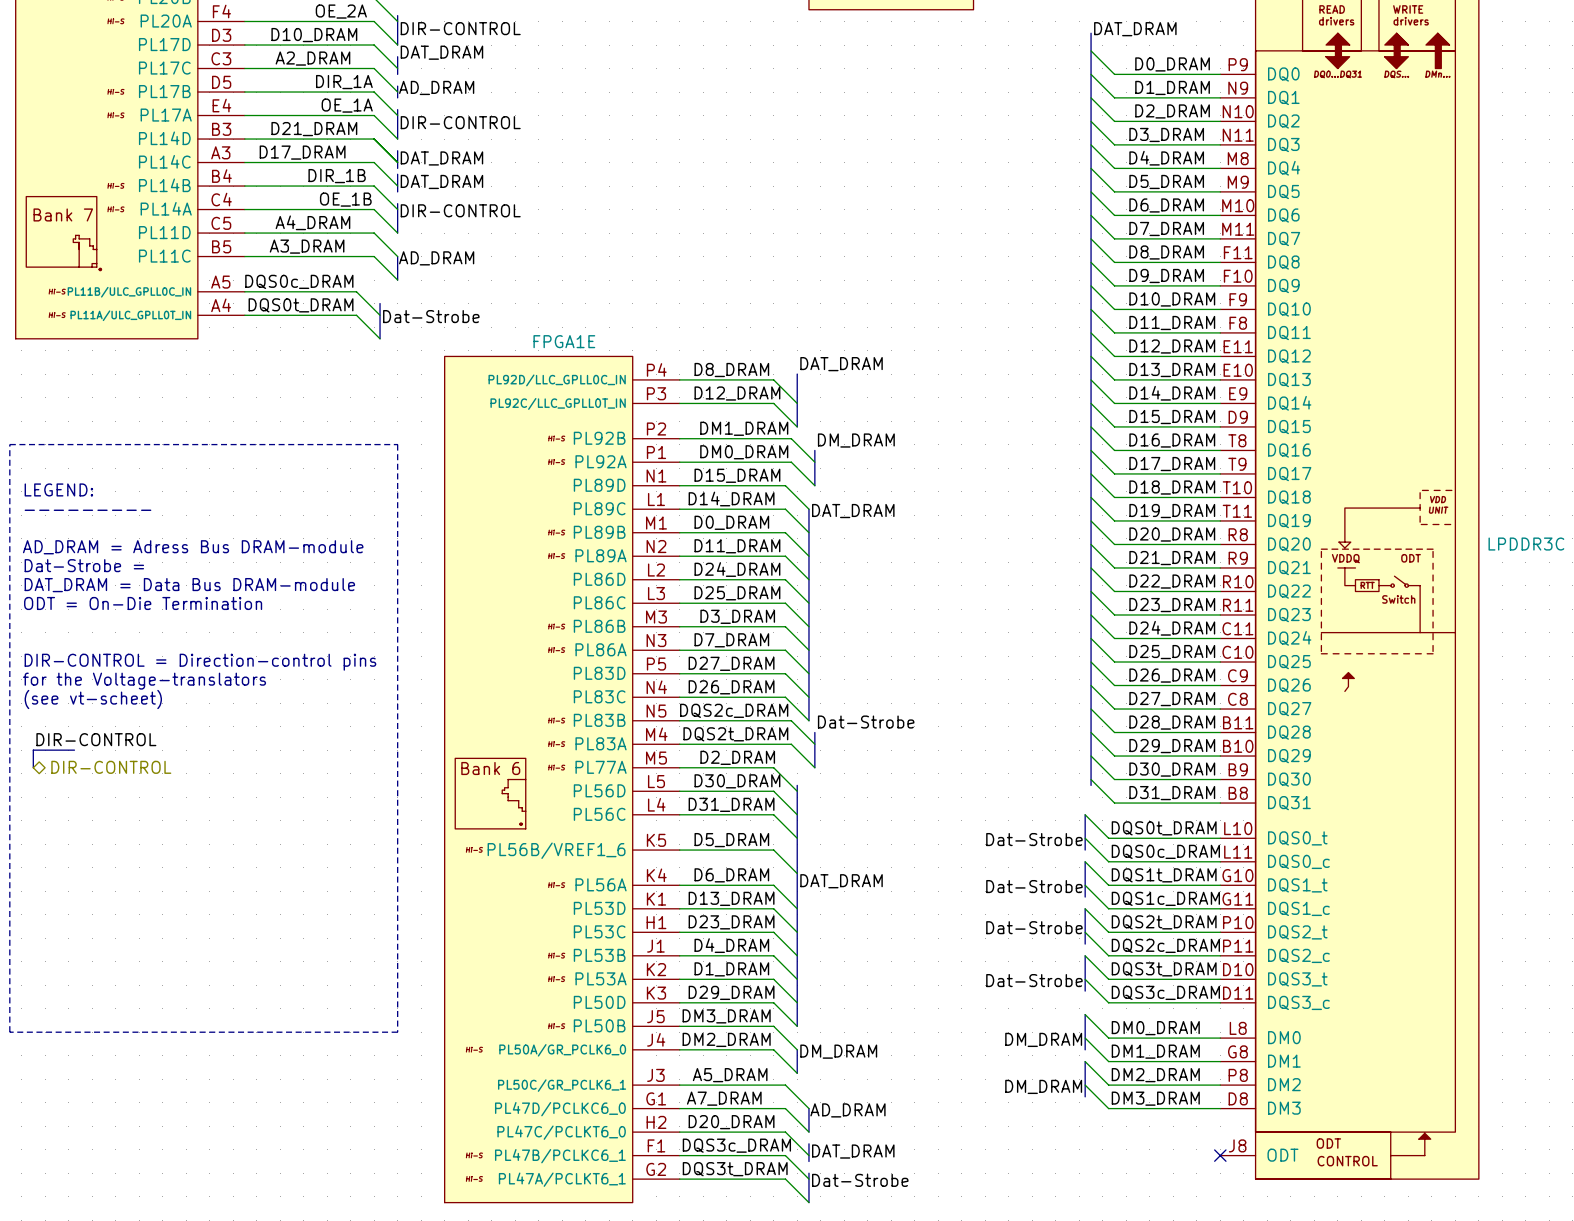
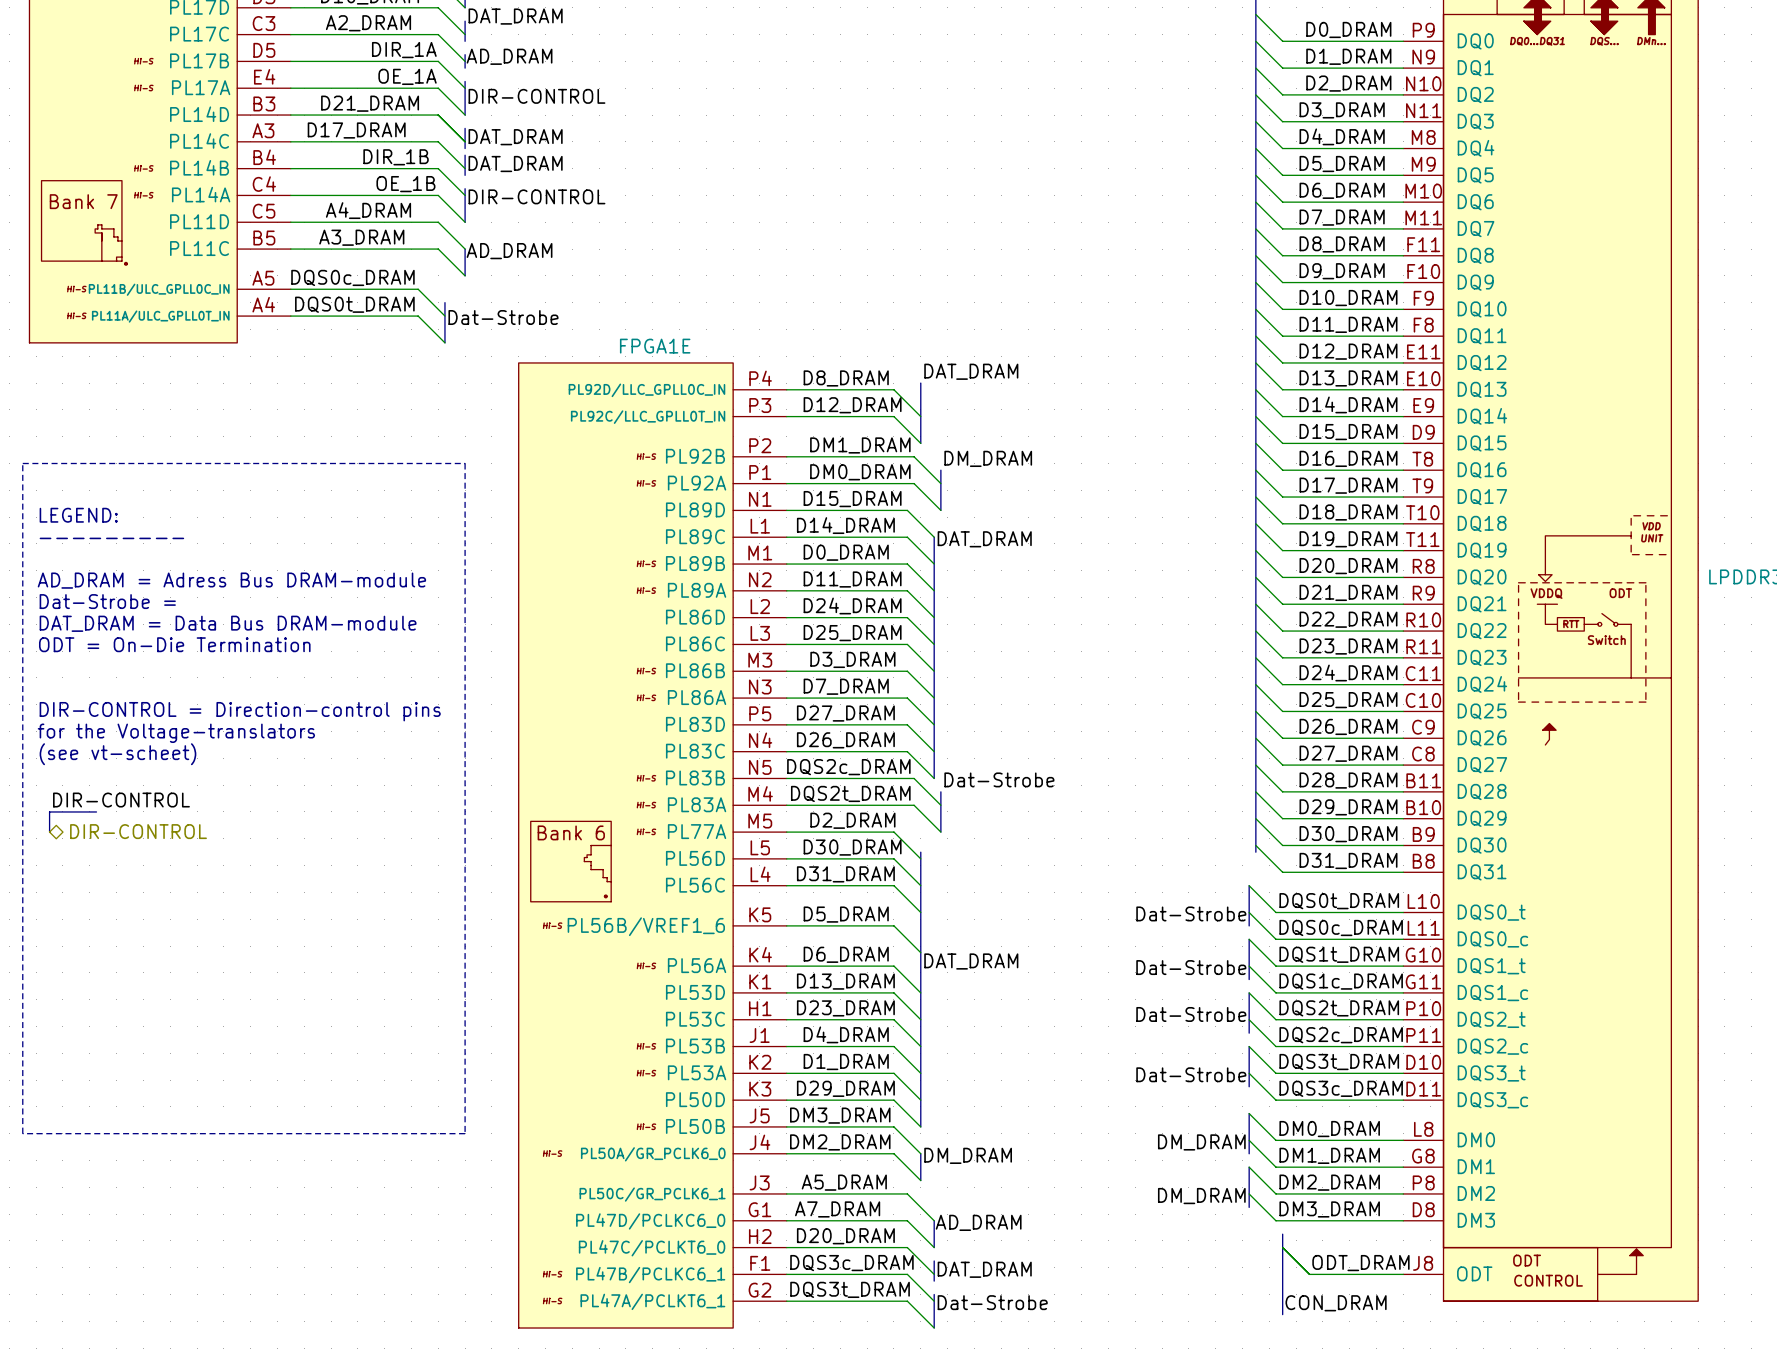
bus: none -> (1282, 1234) (1282, 1314)
wire: none -> (1282, 1247) (1309, 1274) (1403, 1274)
label: none -> ODT_DRAM (1360, 1263)
no-connect mark: (1220, 1155) -> none
label: none -> CON_DRAM (1336, 1303)

